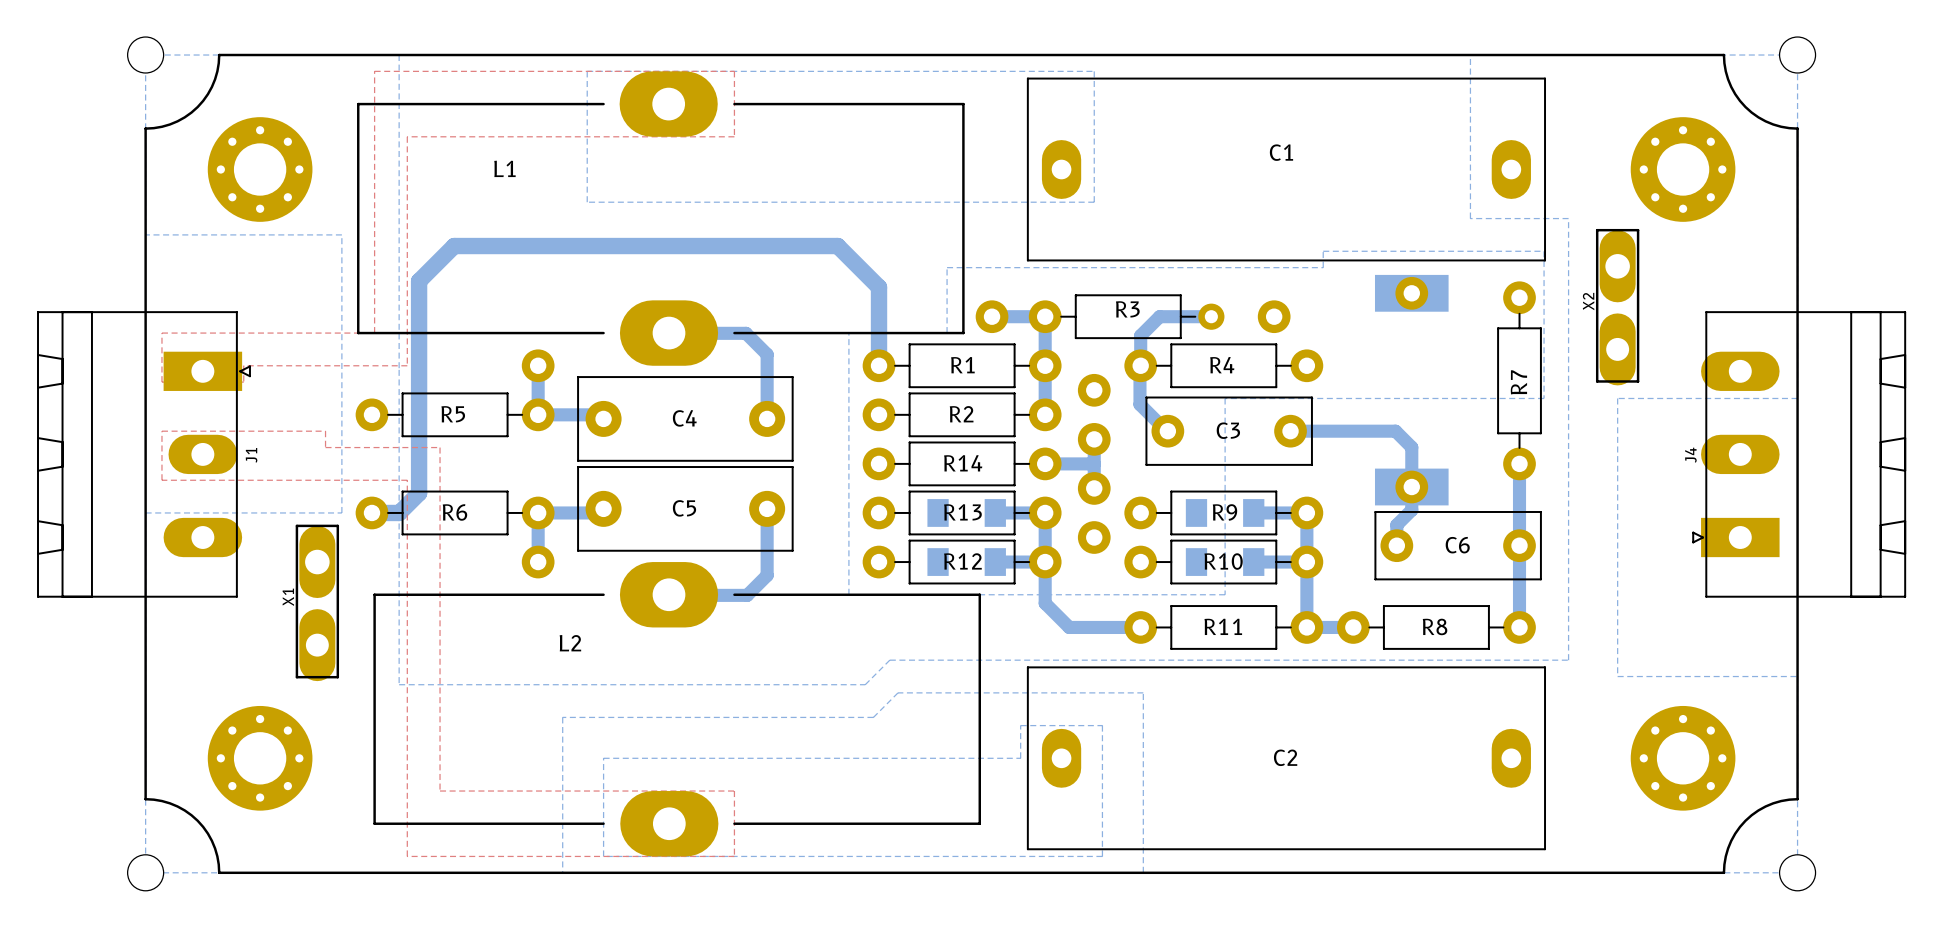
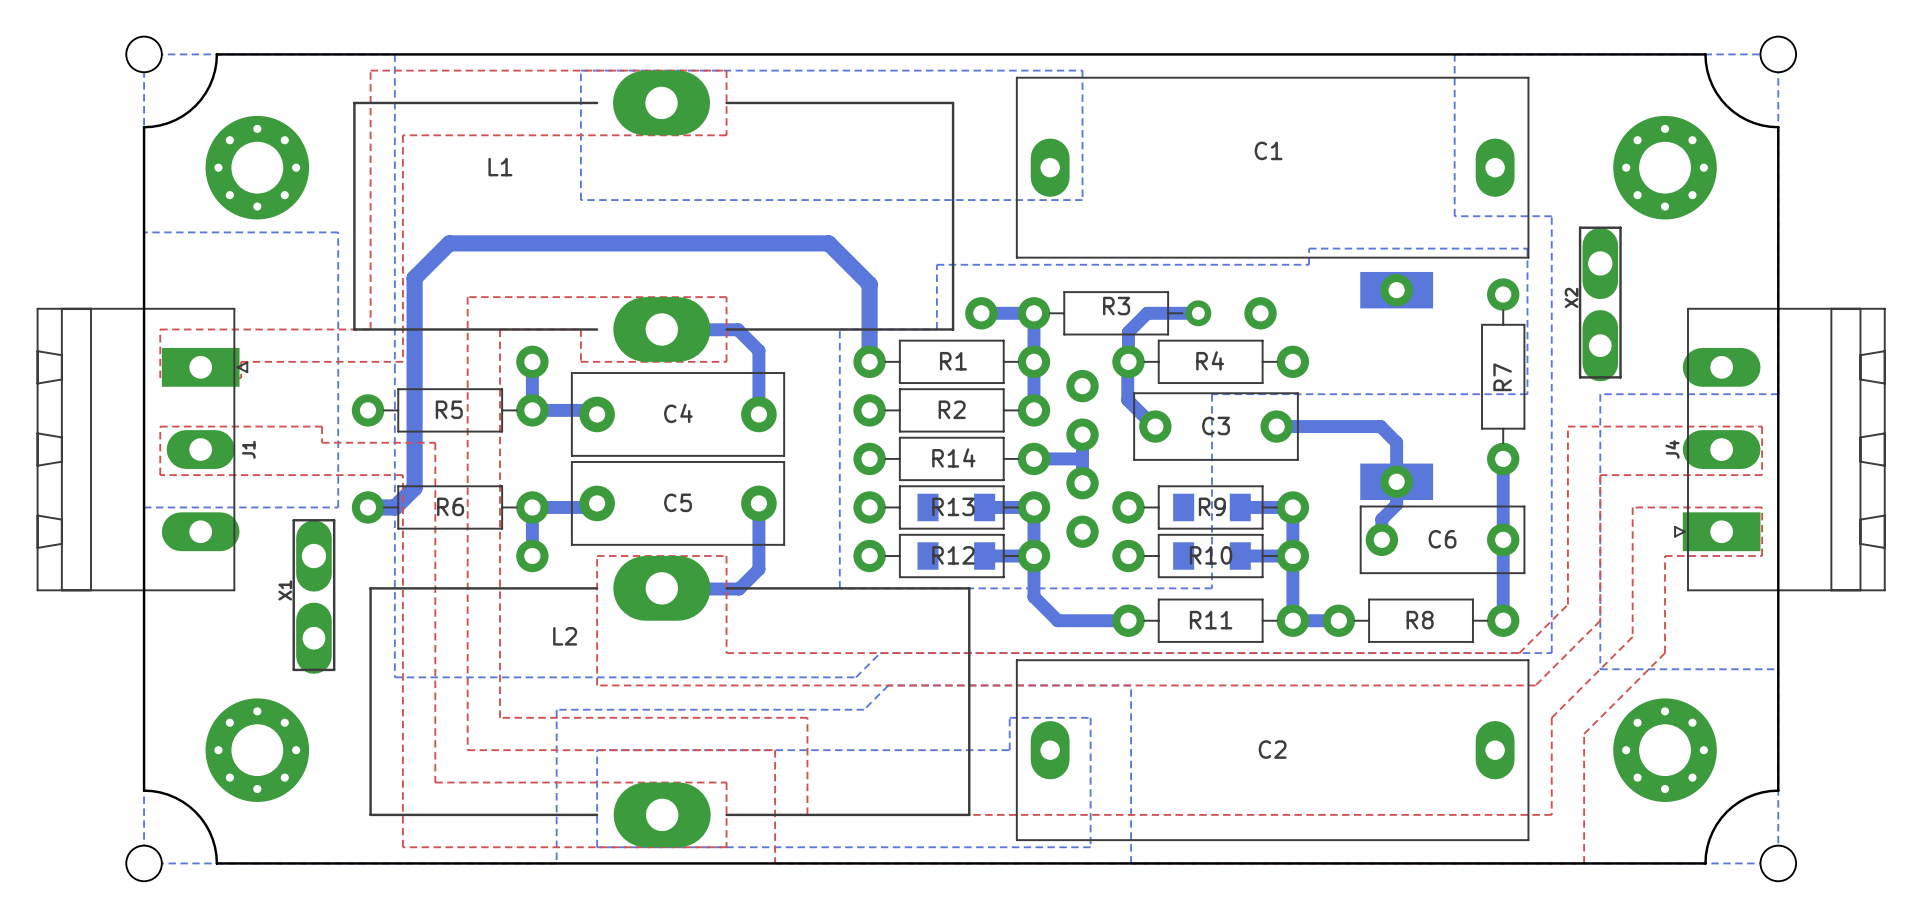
top zone outline: none -> (467, 297) (726, 297) (726, 361) (580, 361) (580, 329) (500, 329) (500, 717) (807, 717) (807, 814) (1551, 814) (1551, 717) (1632, 636) (1632, 507) (1762, 507) (1762, 556) (1665, 556) (1665, 653) (1584, 734) (1584, 863) (775, 863) (775, 750) (467, 750) (467, 297)
top zone outline: none -> (1567, 426) (1567, 604) (1519, 653) (726, 653) (726, 556) (597, 556) (597, 685) (1535, 685) (1600, 620) (1600, 475) (1762, 475) (1762, 426) (1567, 426)

